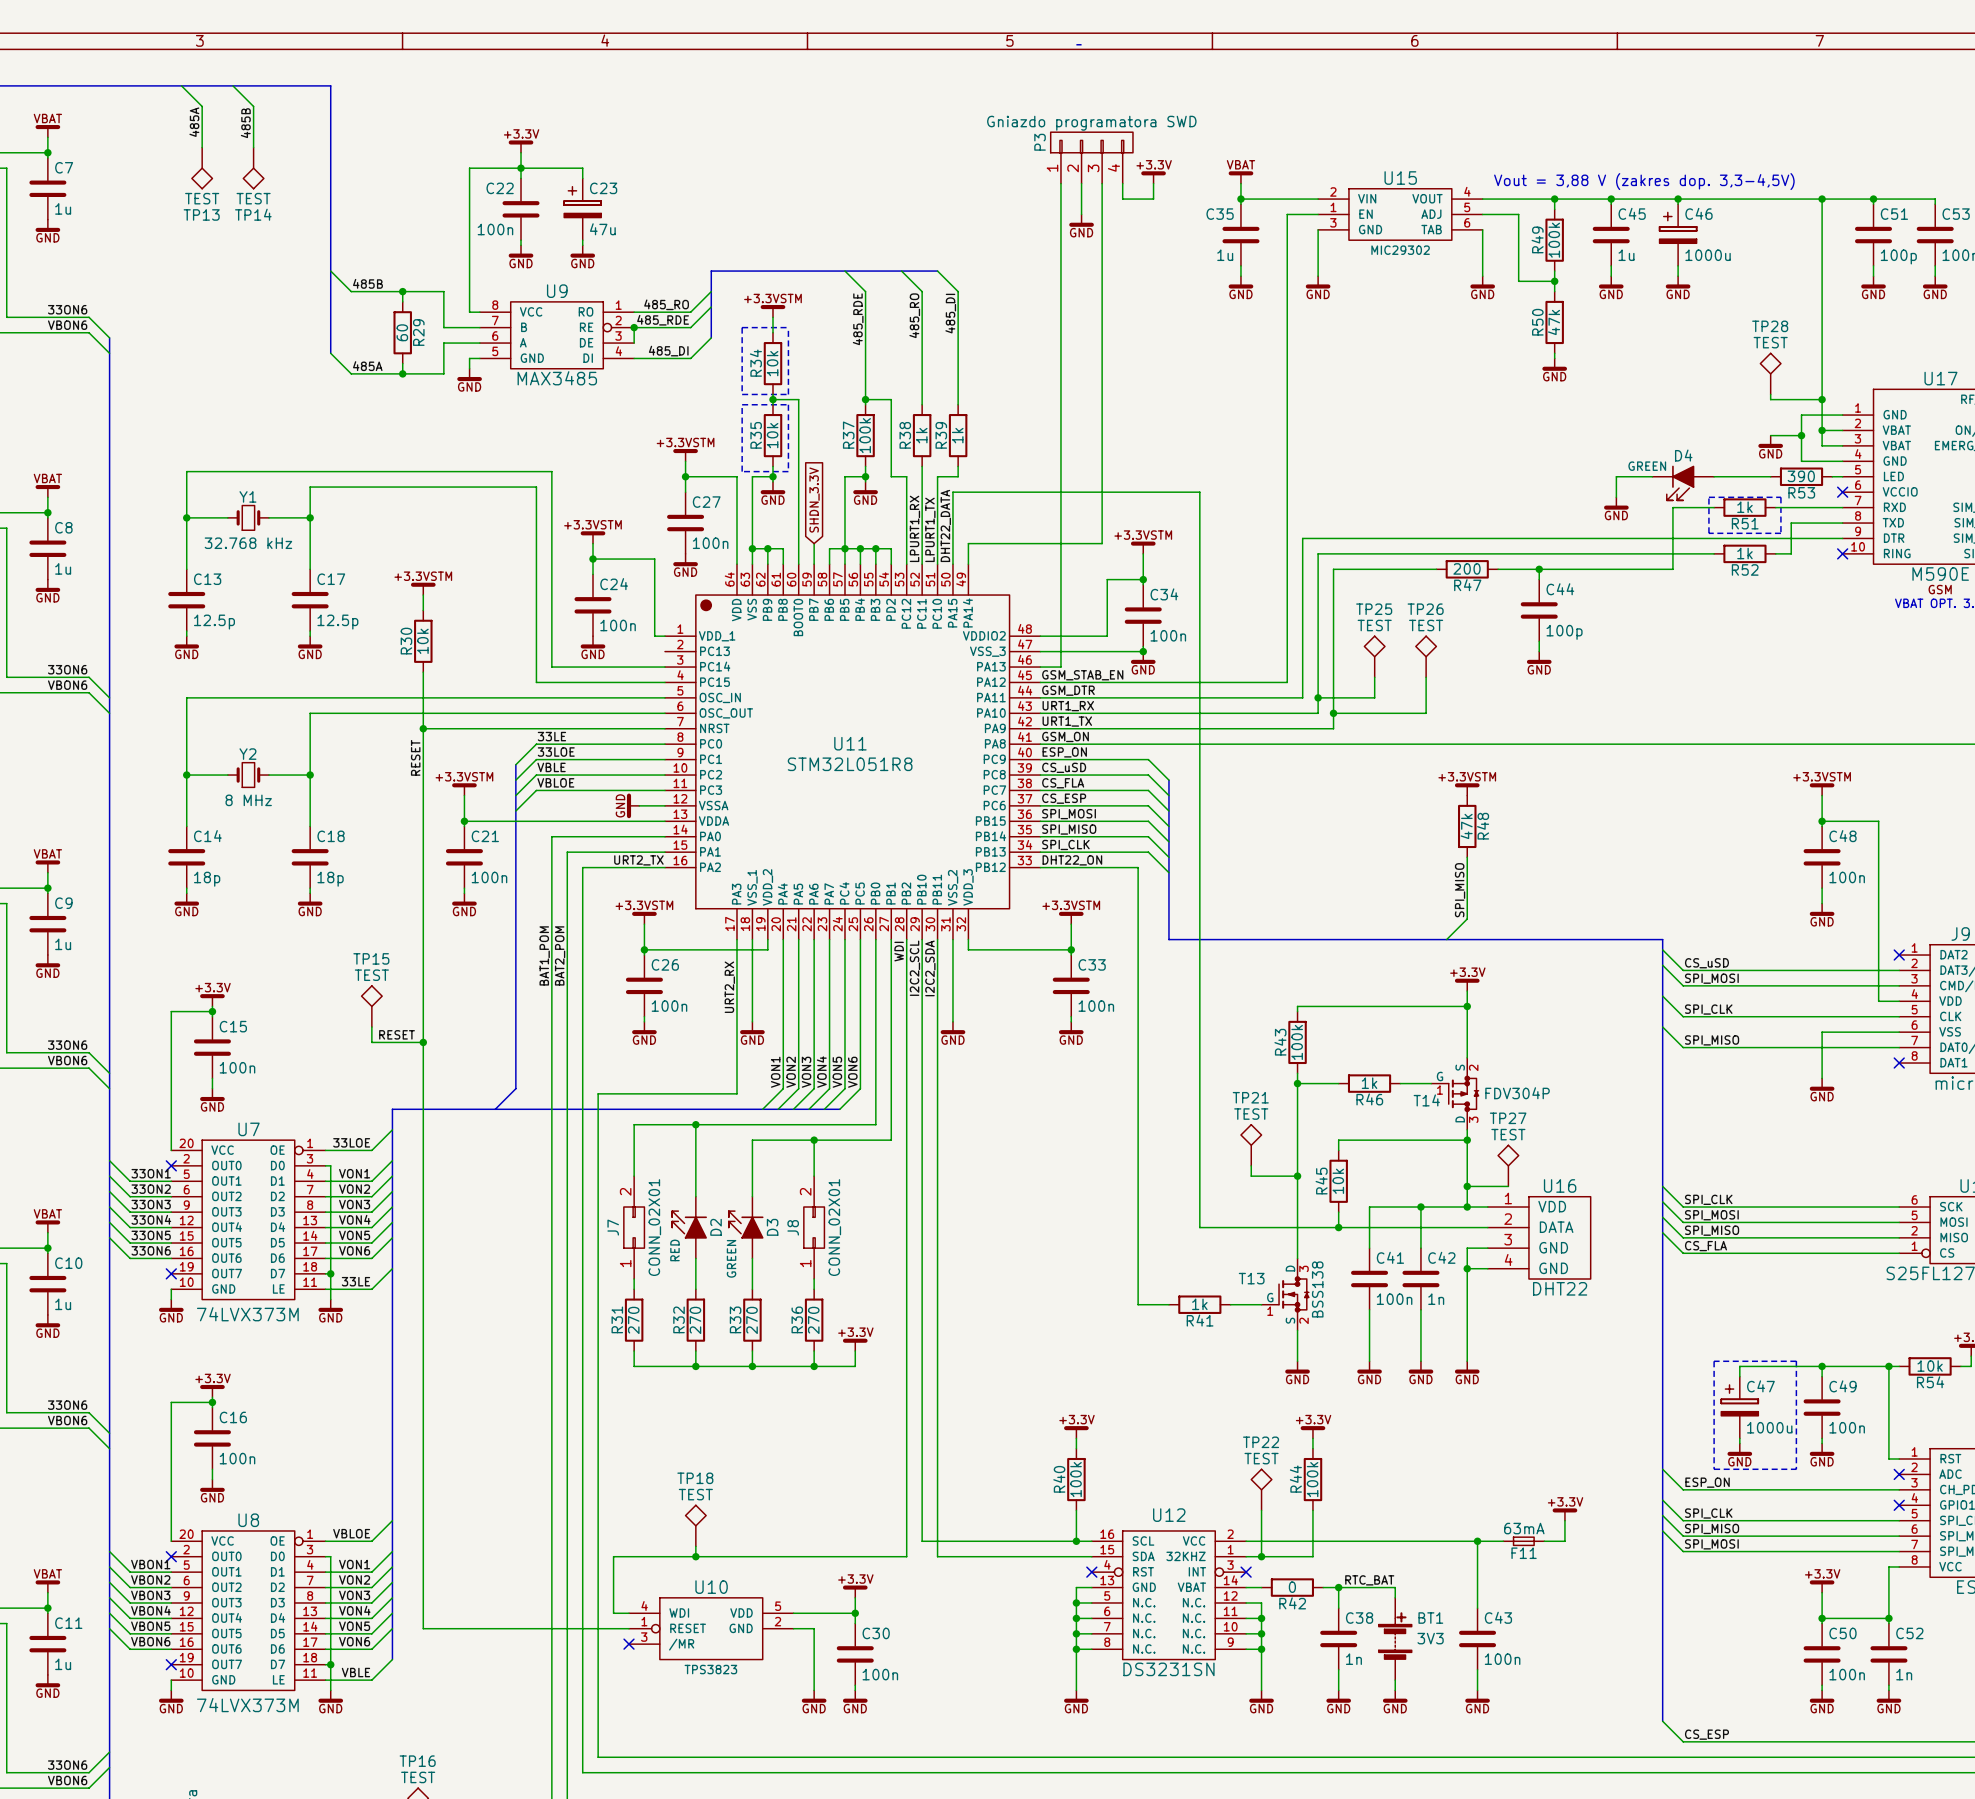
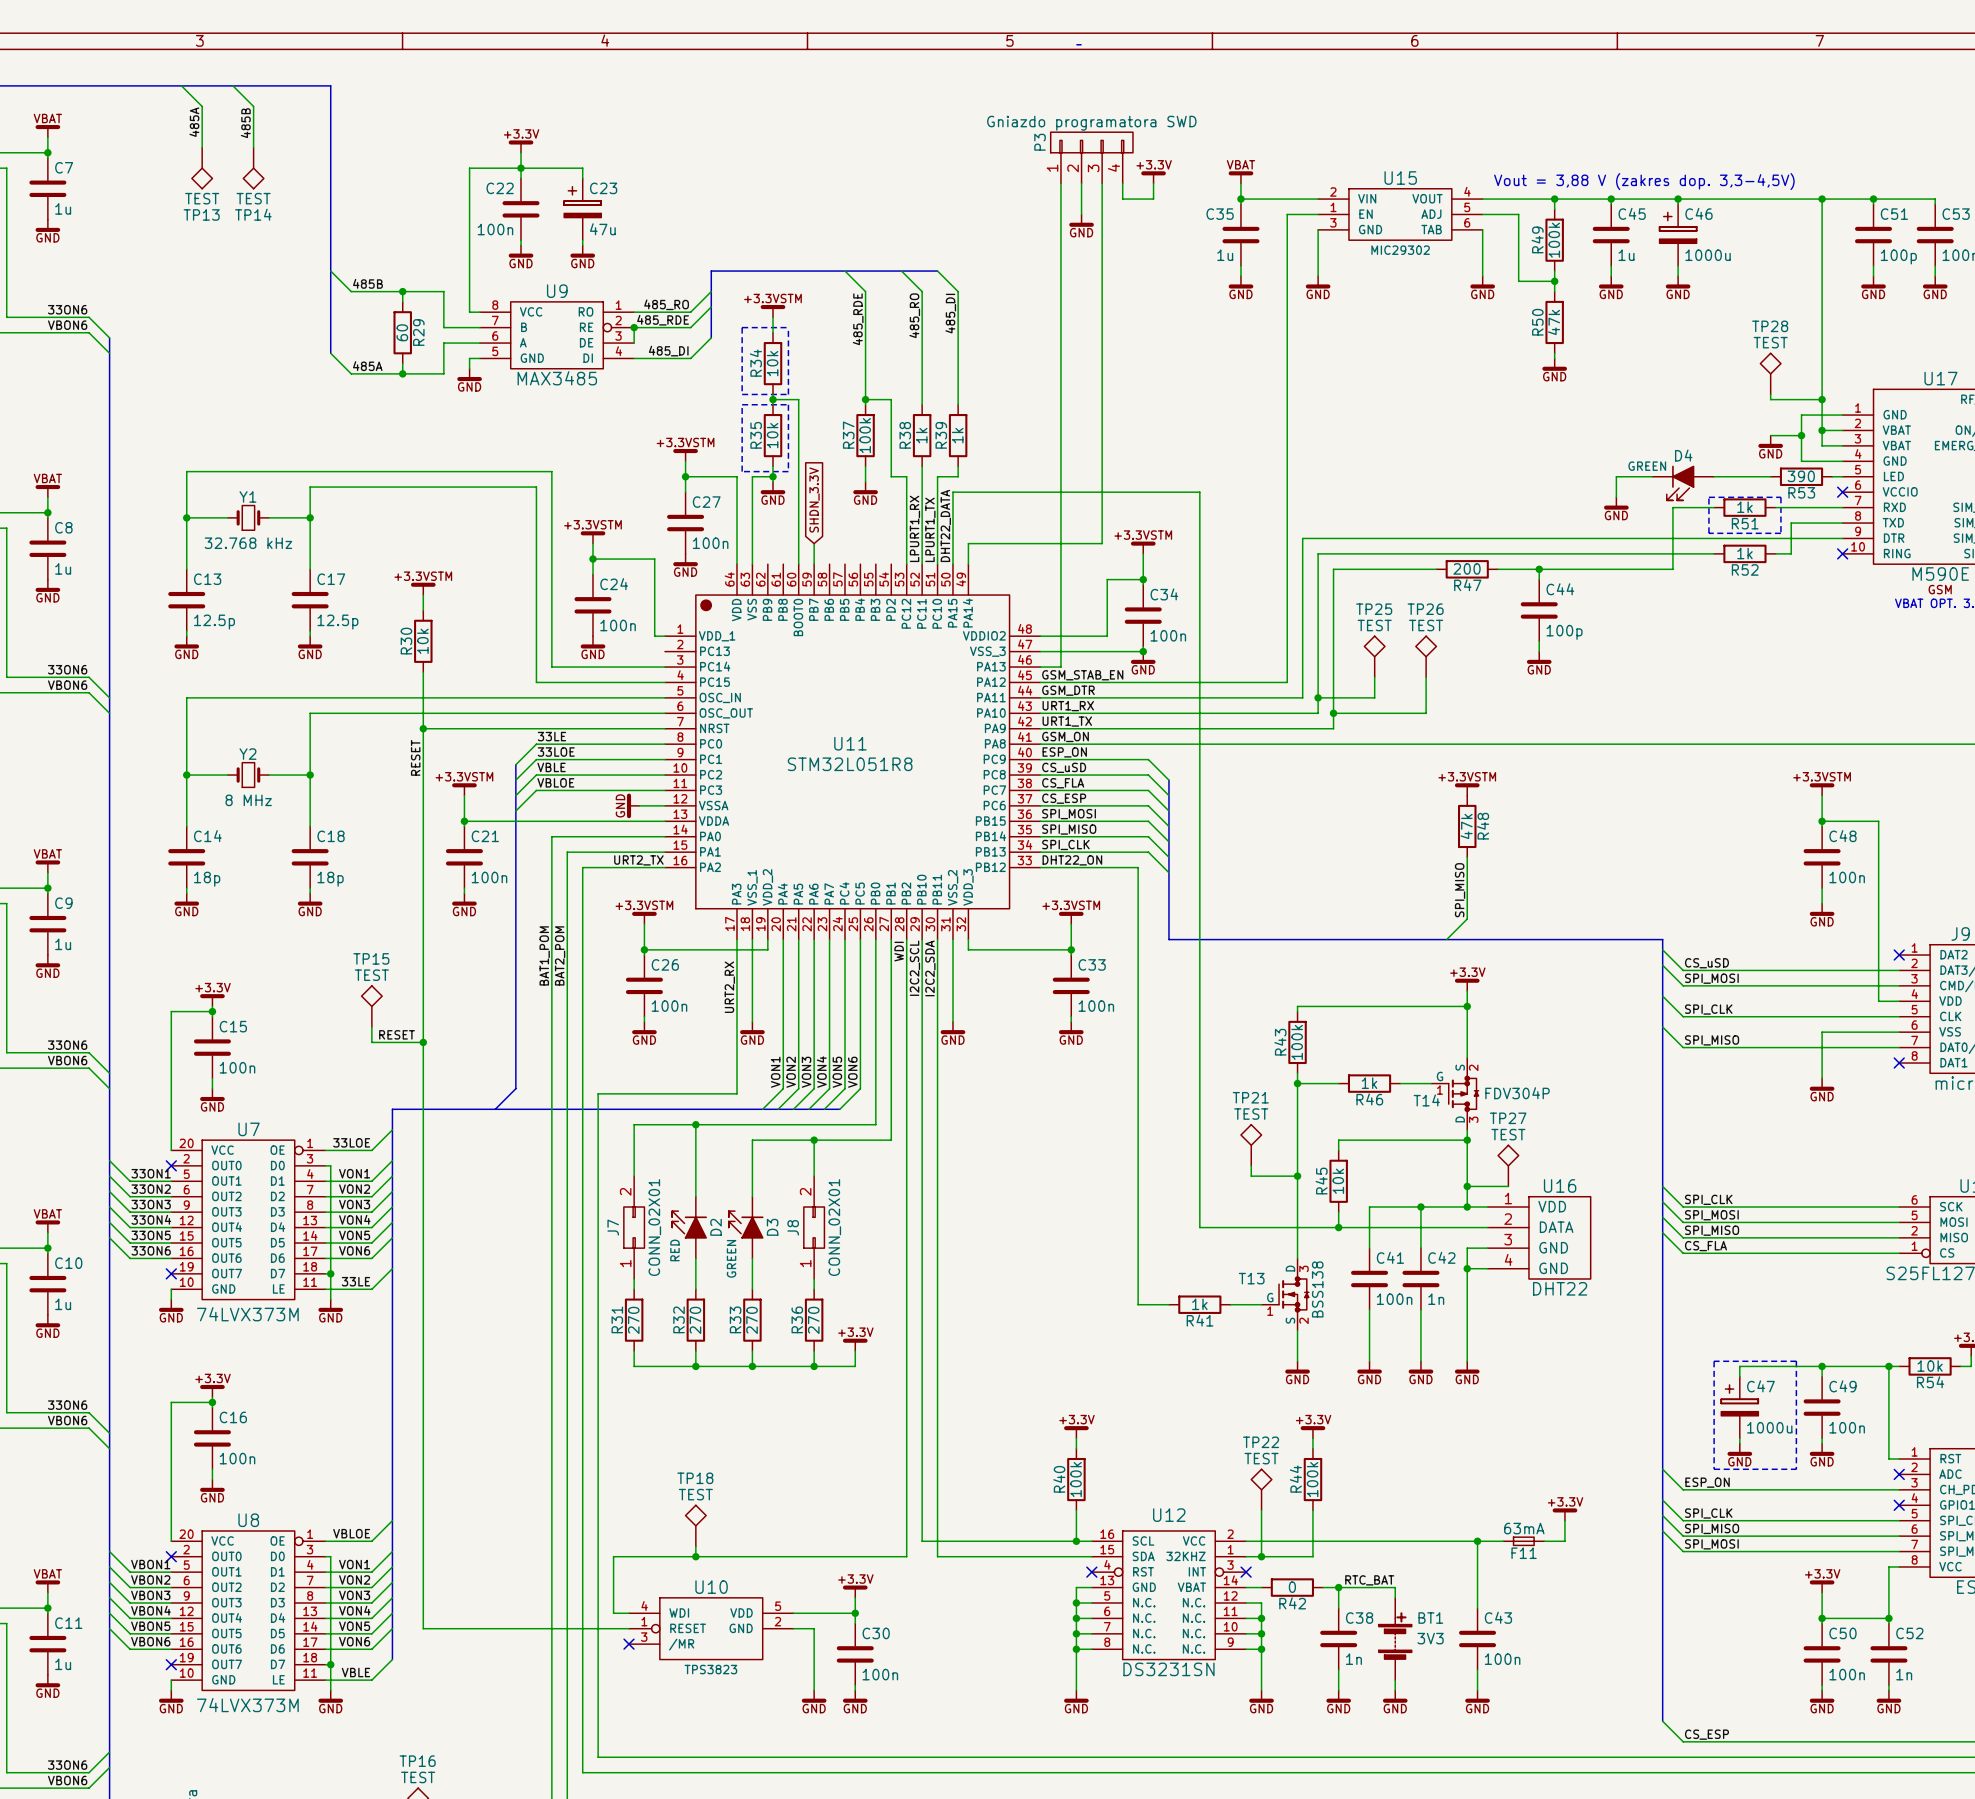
wire: (865, 476) (844, 476) (844, 564) -> none
junction: (865, 476) -> none
wire: (752, 548) (783, 548) (783, 564) -> none
junction: (752, 548) -> none
wire: (767, 548) (767, 564) -> none
junction: (767, 548) -> none
junction: (844, 548) -> none
wire: (860, 548) (860, 564) -> none
junction: (860, 548) -> none
wire: (875, 548) (875, 564) -> none
junction: (875, 548) -> none
wire: (829, 564) (829, 548) (891, 548) (891, 564) -> none

